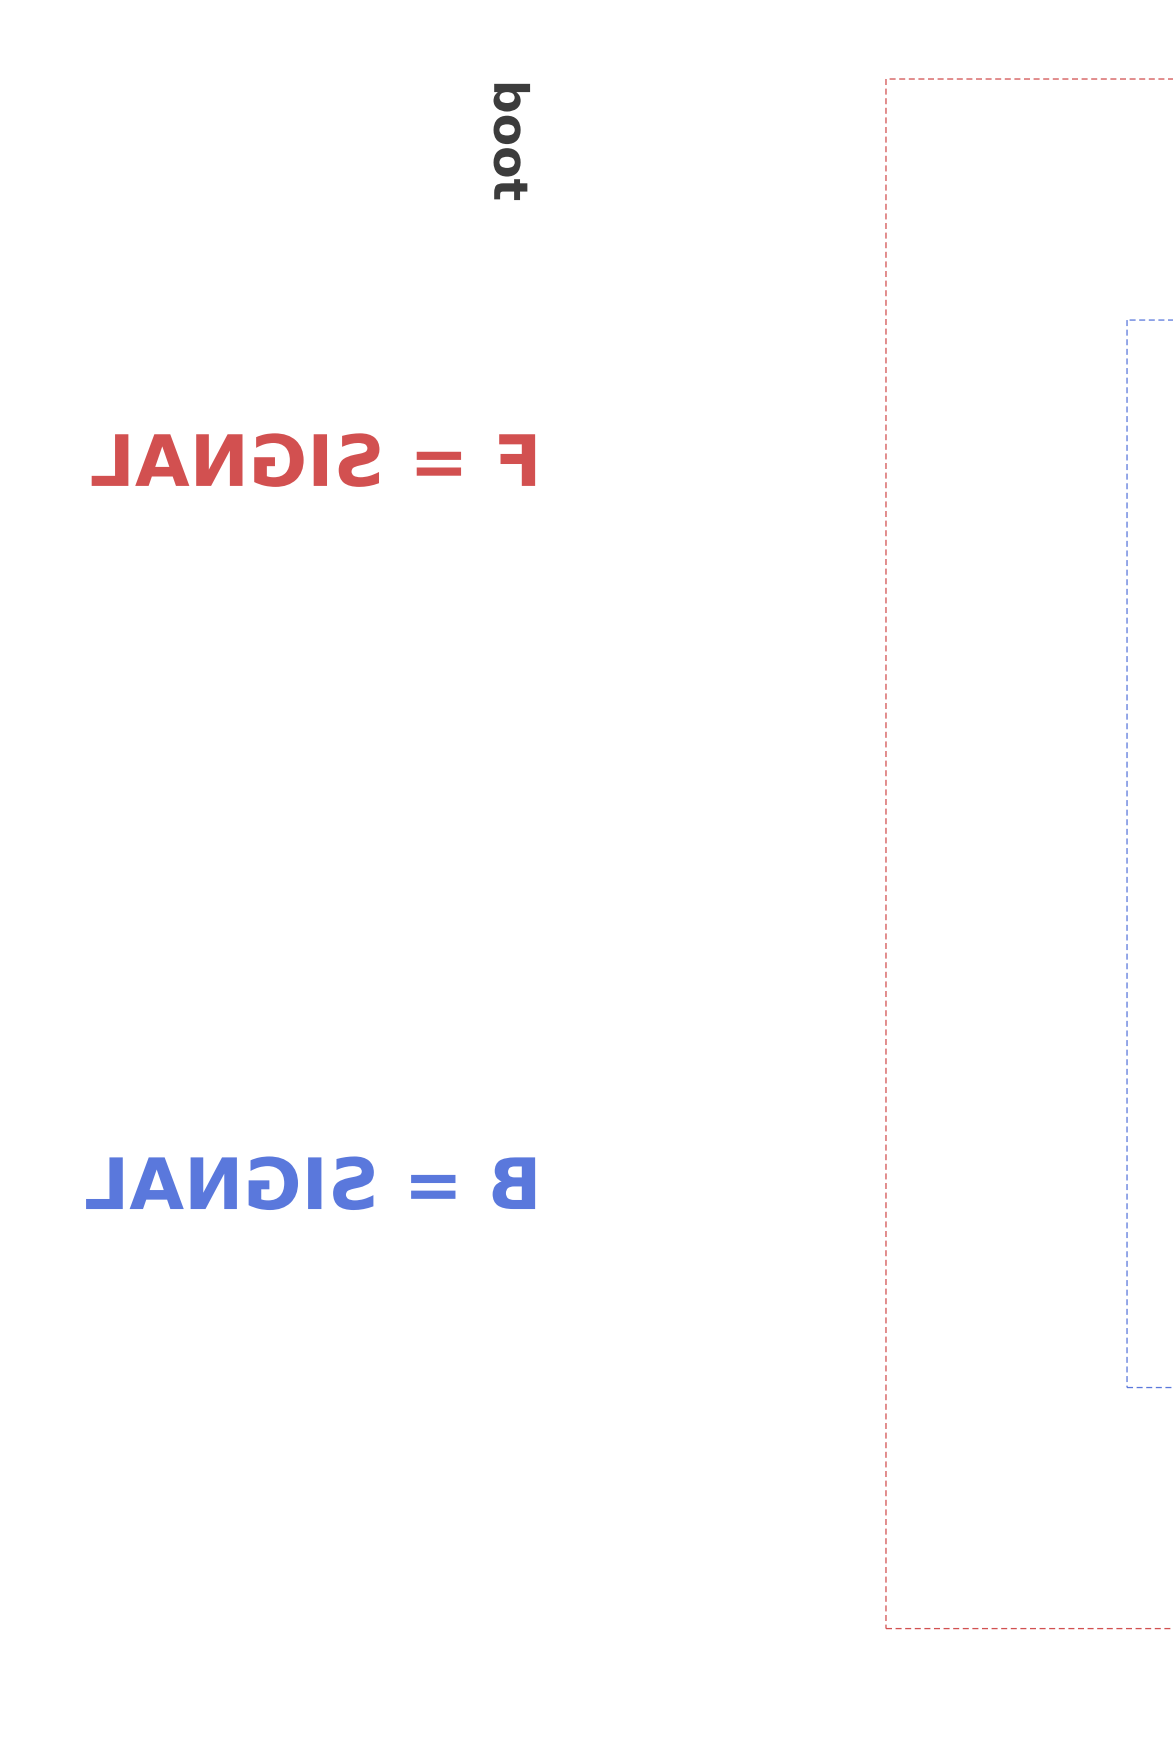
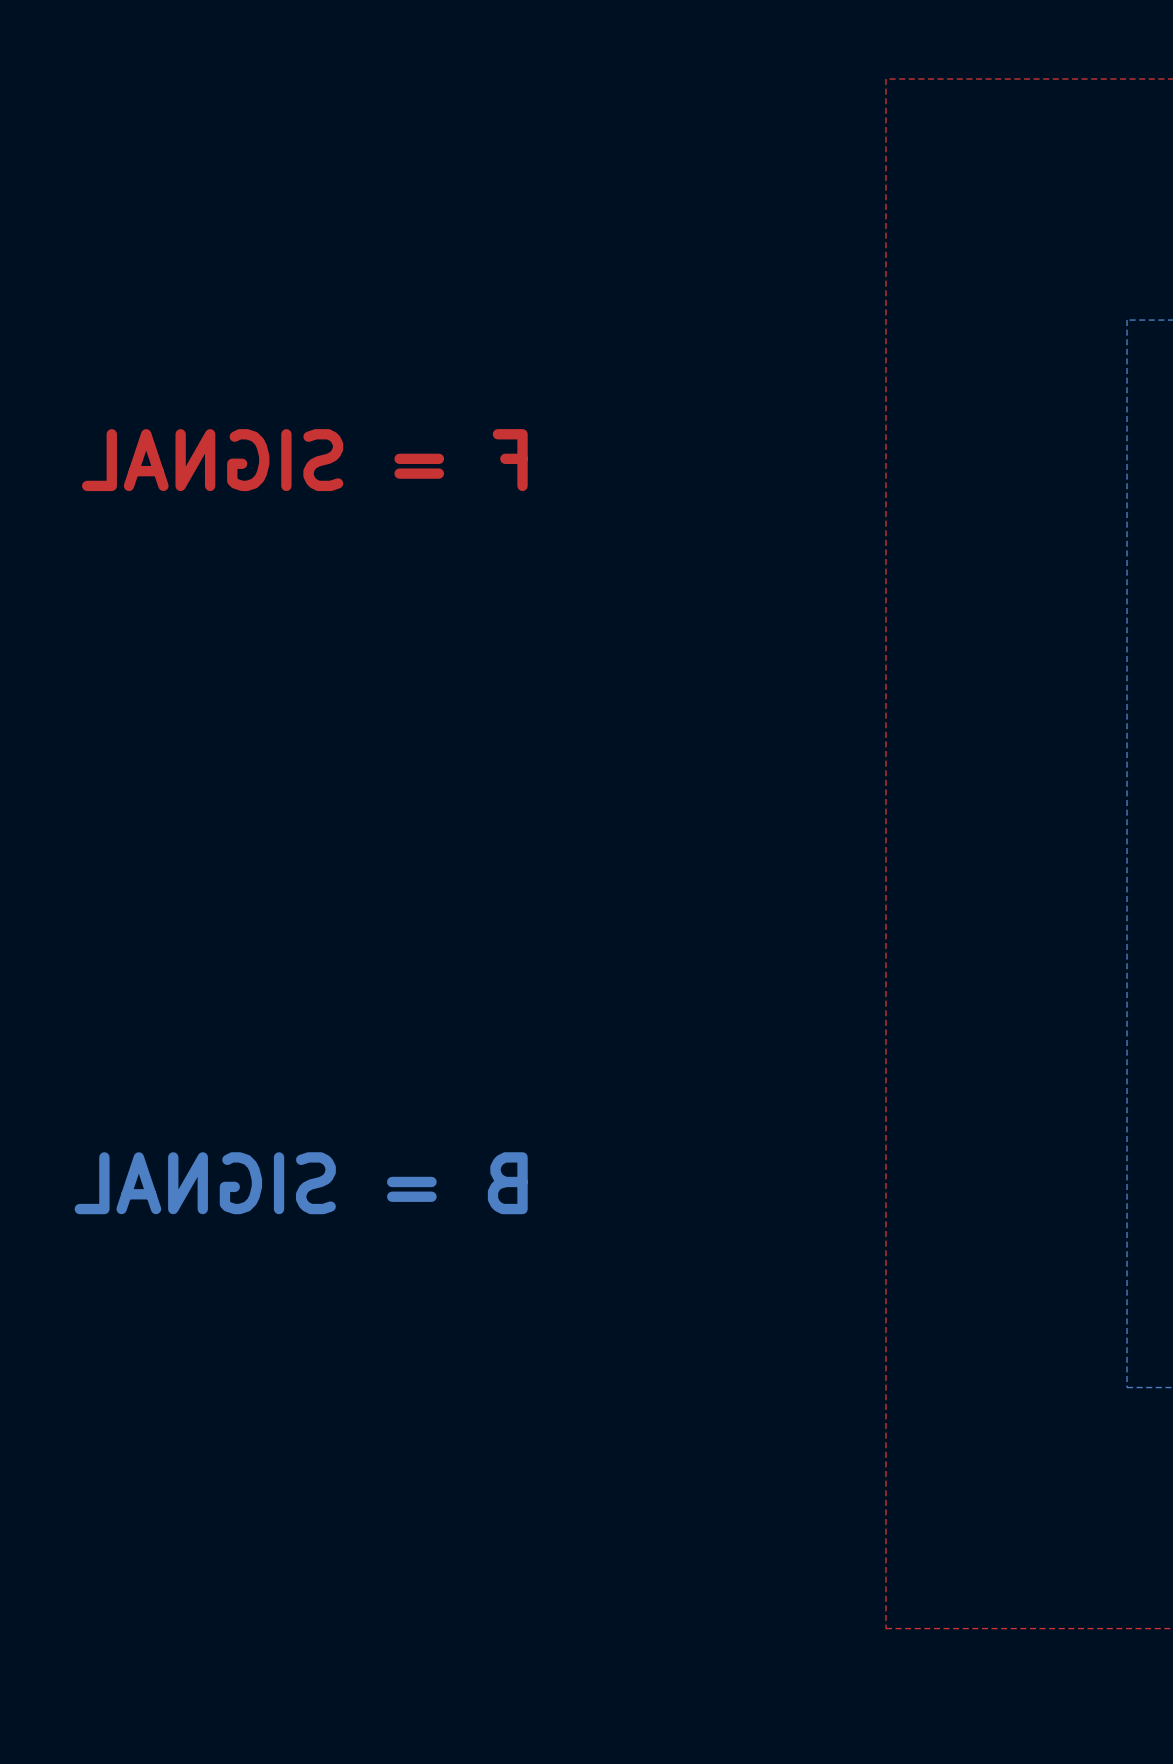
text: boot (511, 141) -> none

